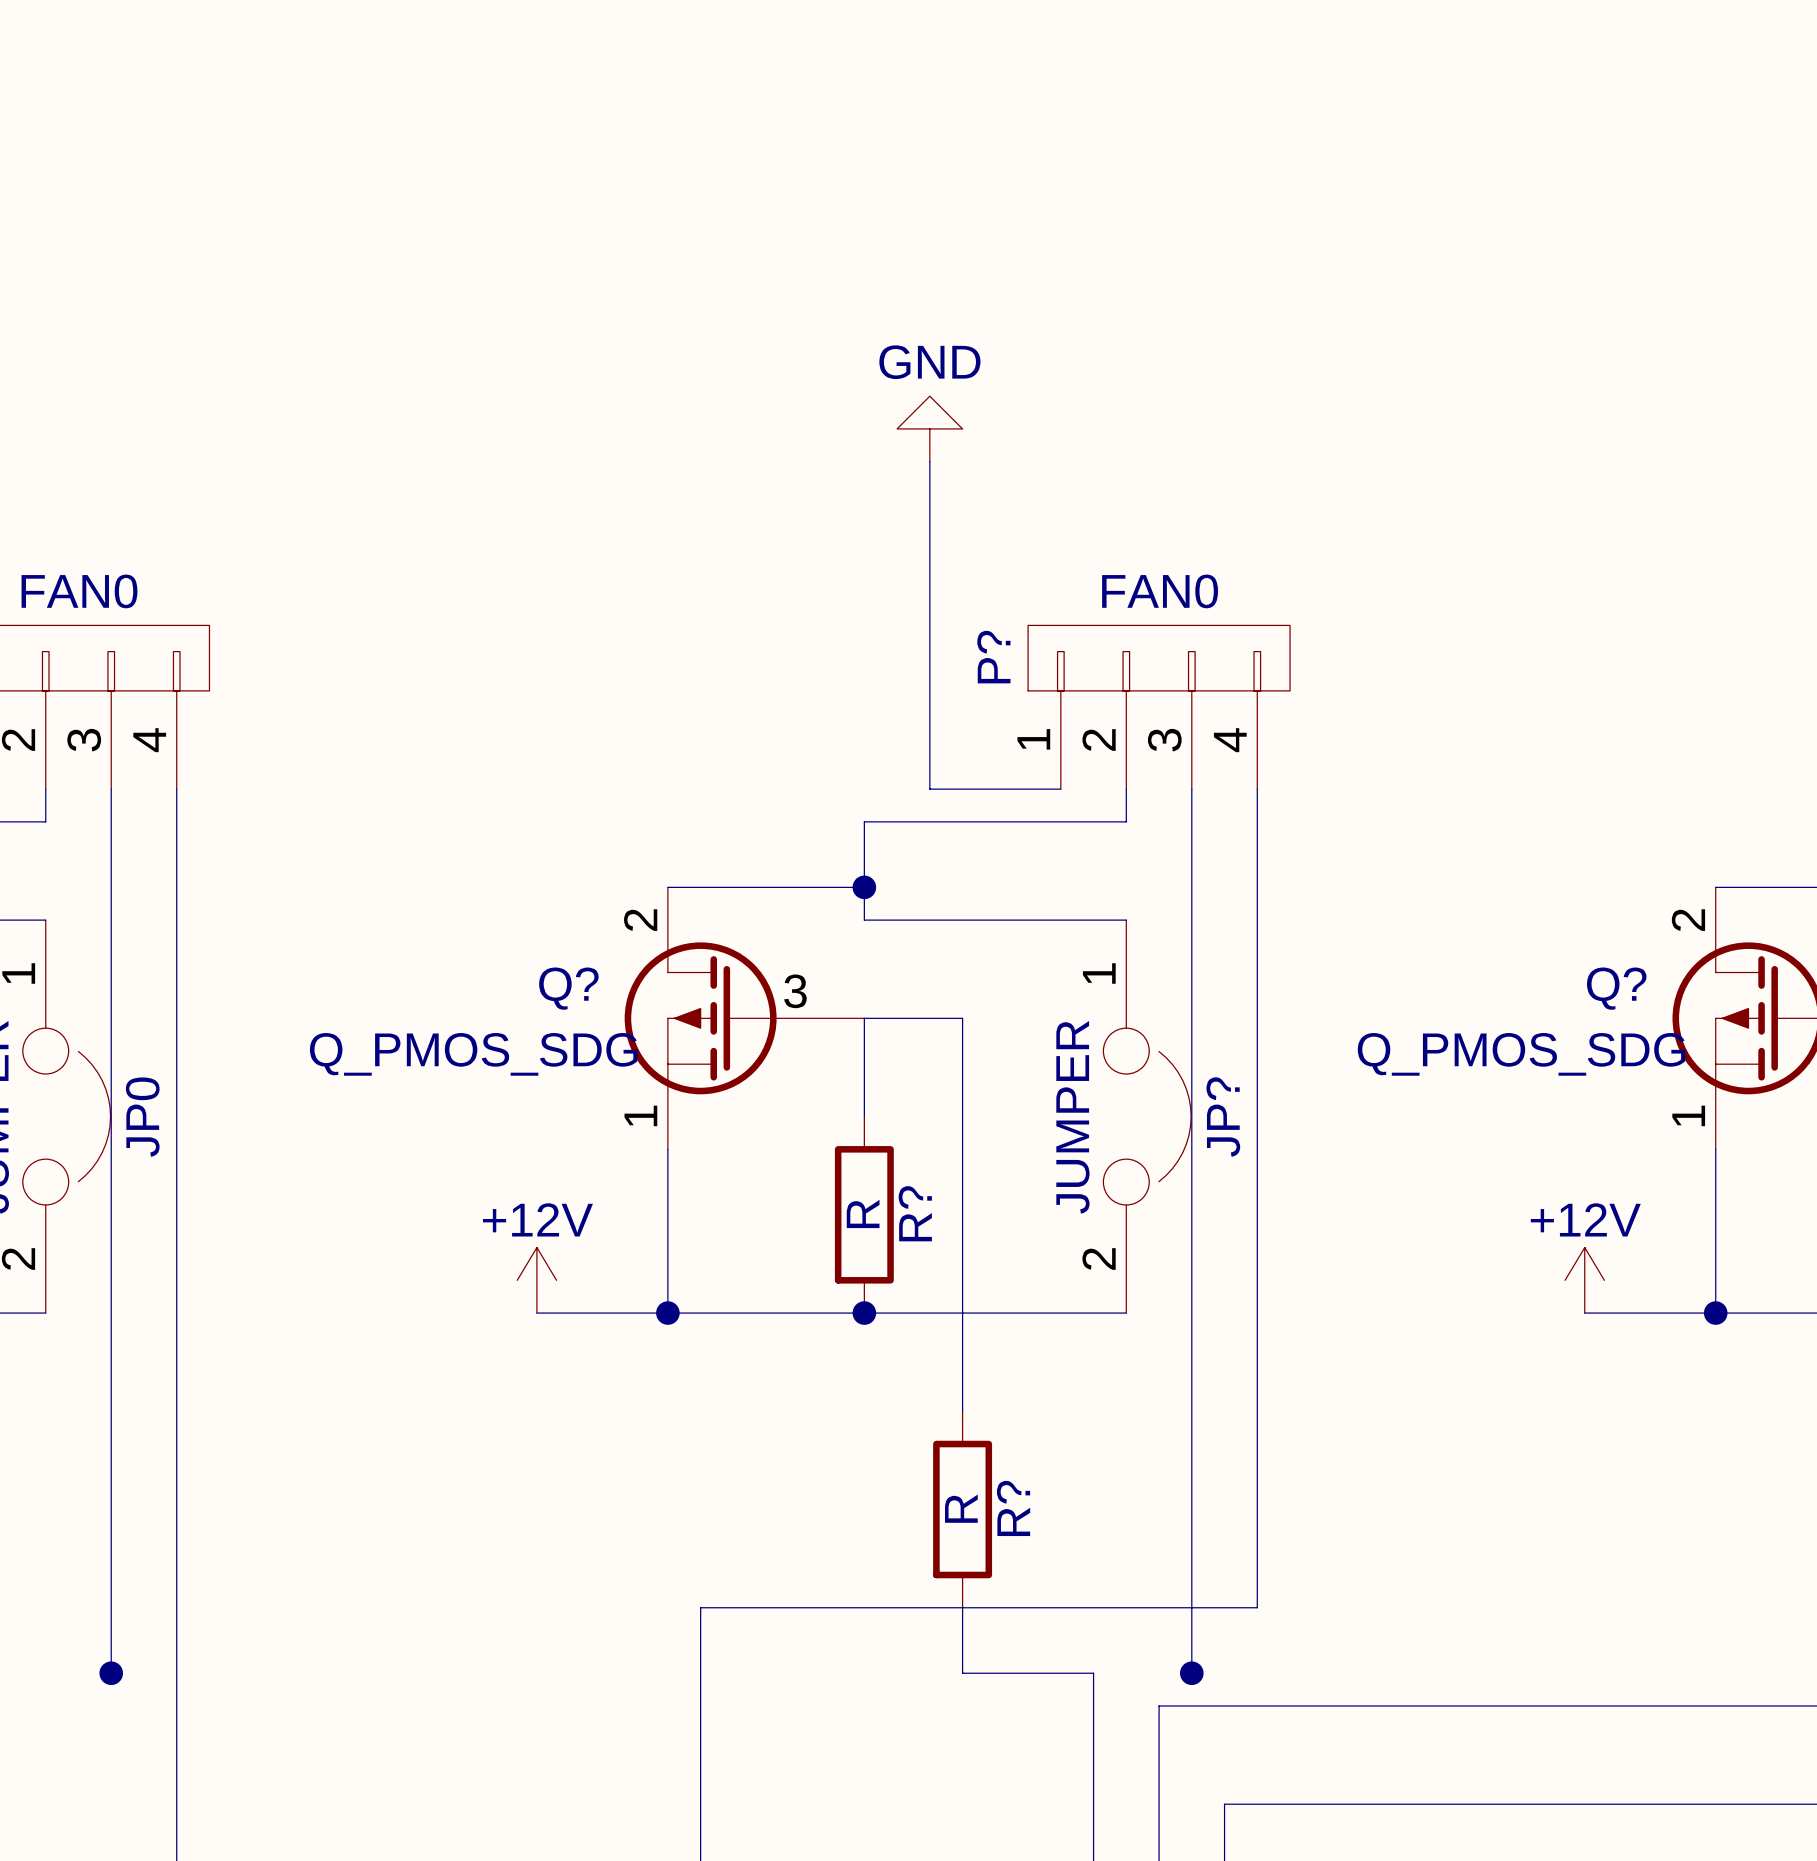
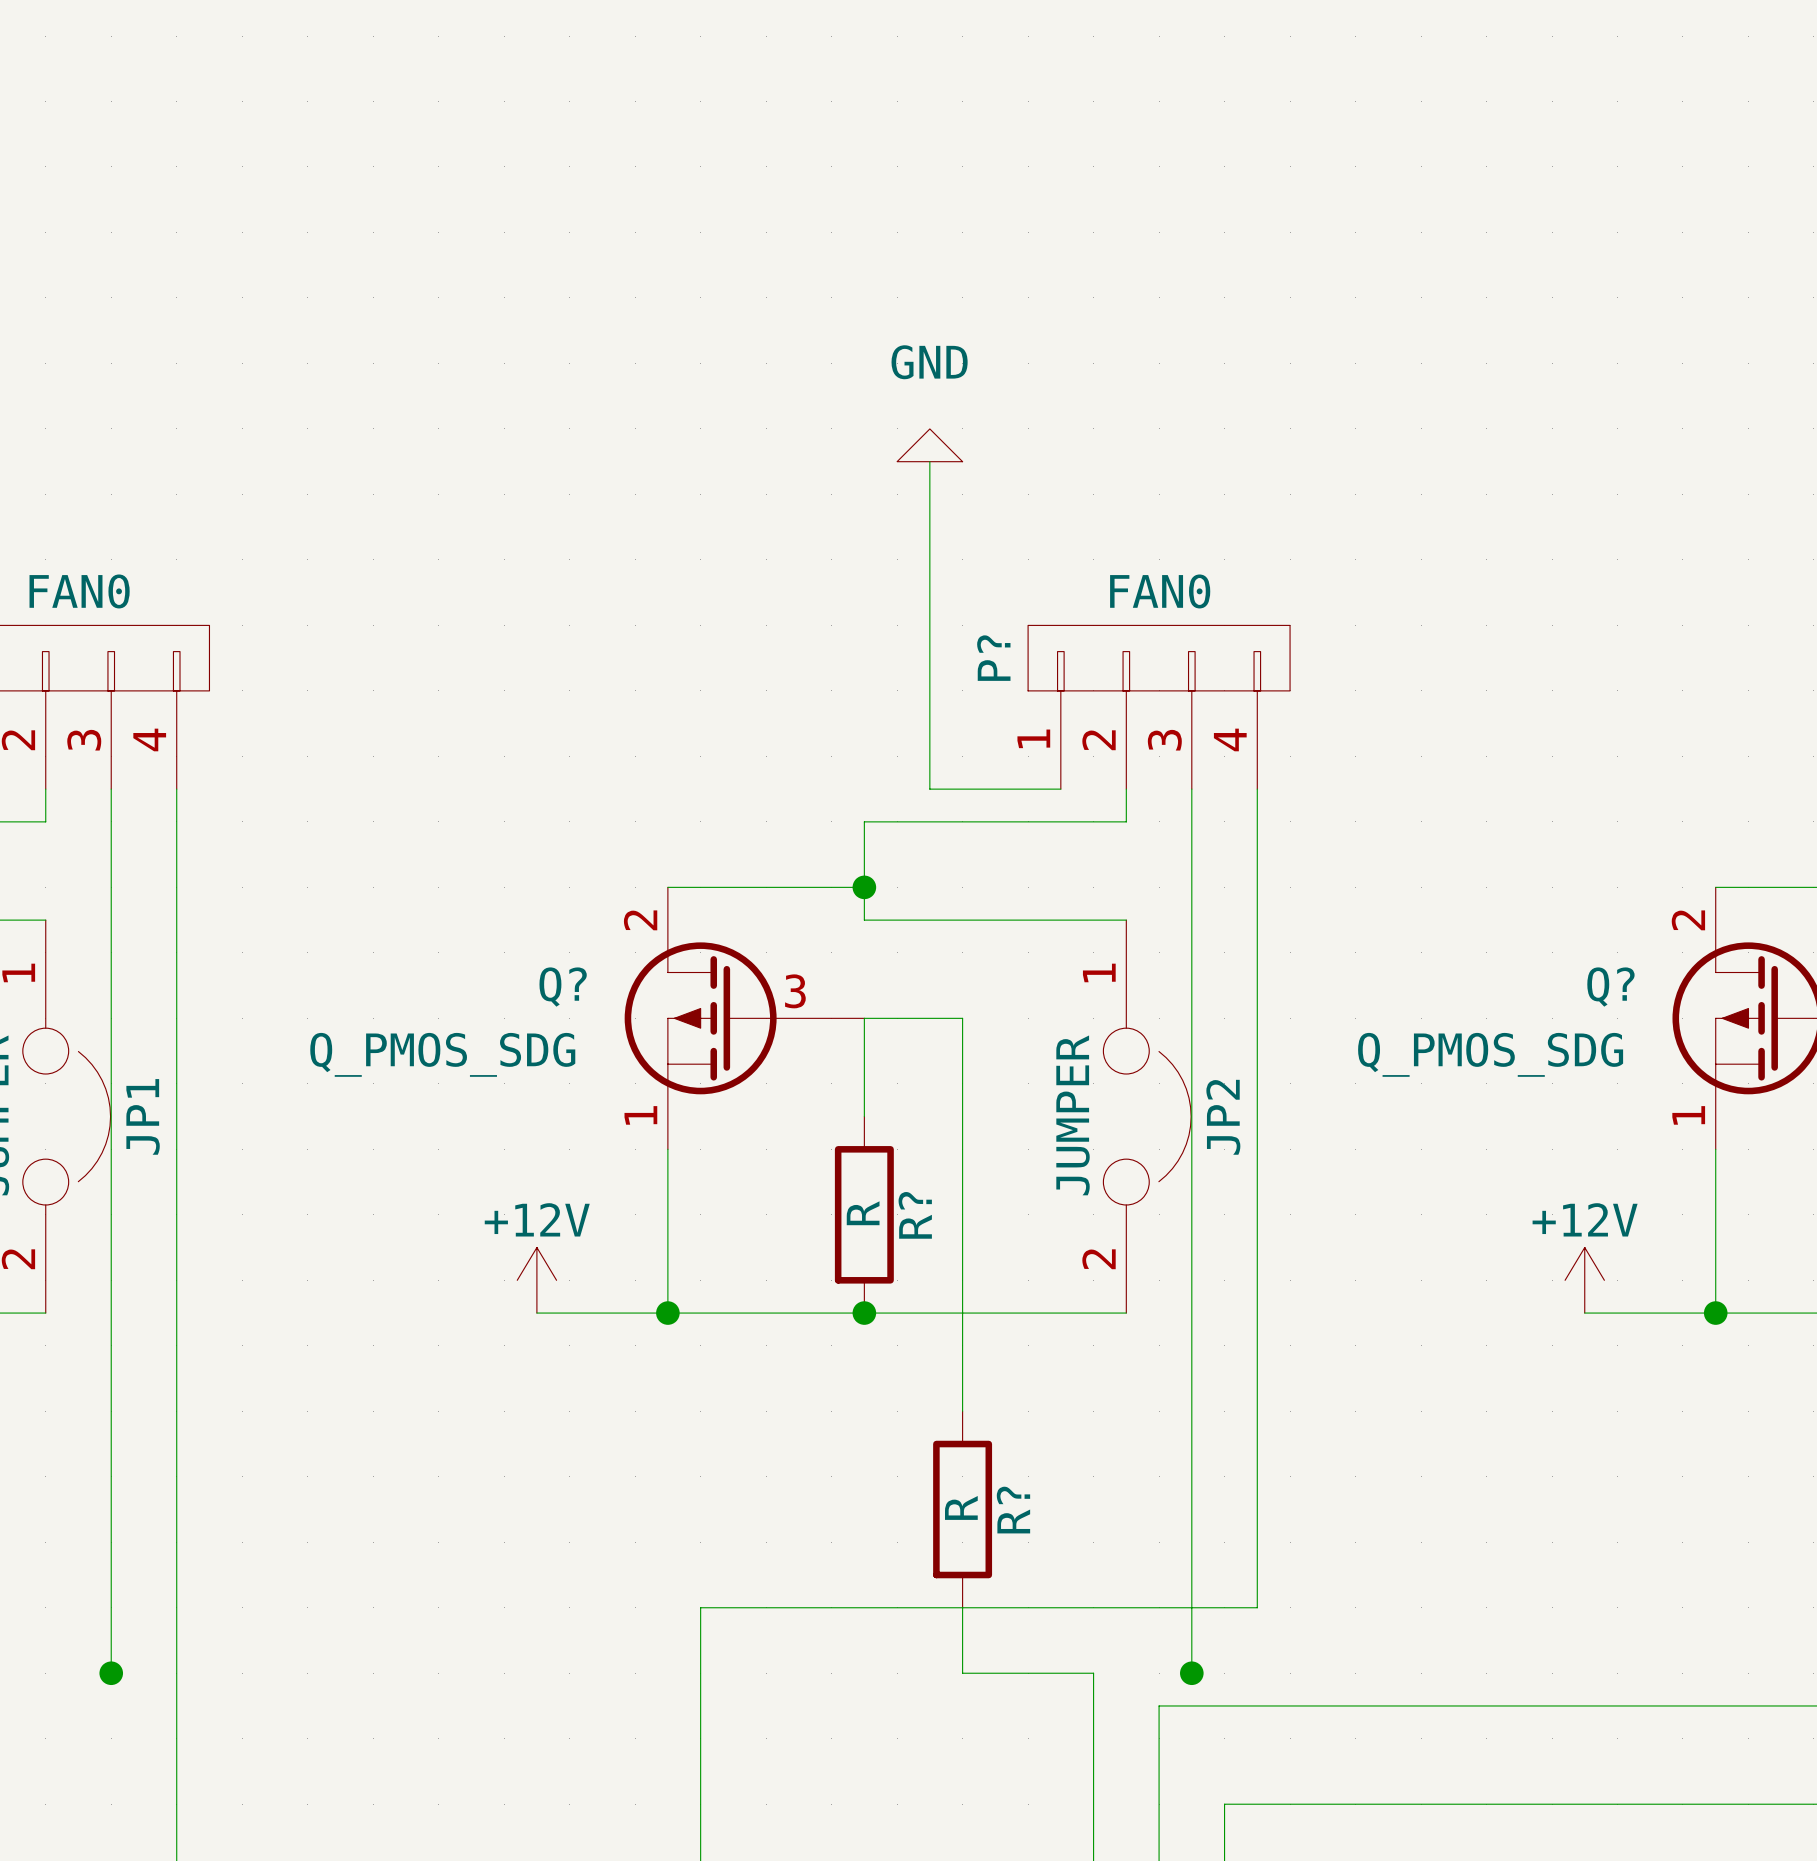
power symbol shape: [897, 396, 963, 462] -> [897, 428, 963, 462]
JP0 name: JP0 (142, 1117) -> JP1 (143, 1116)
JP? name: JP? (1223, 1117) -> JP2 (1223, 1117)

